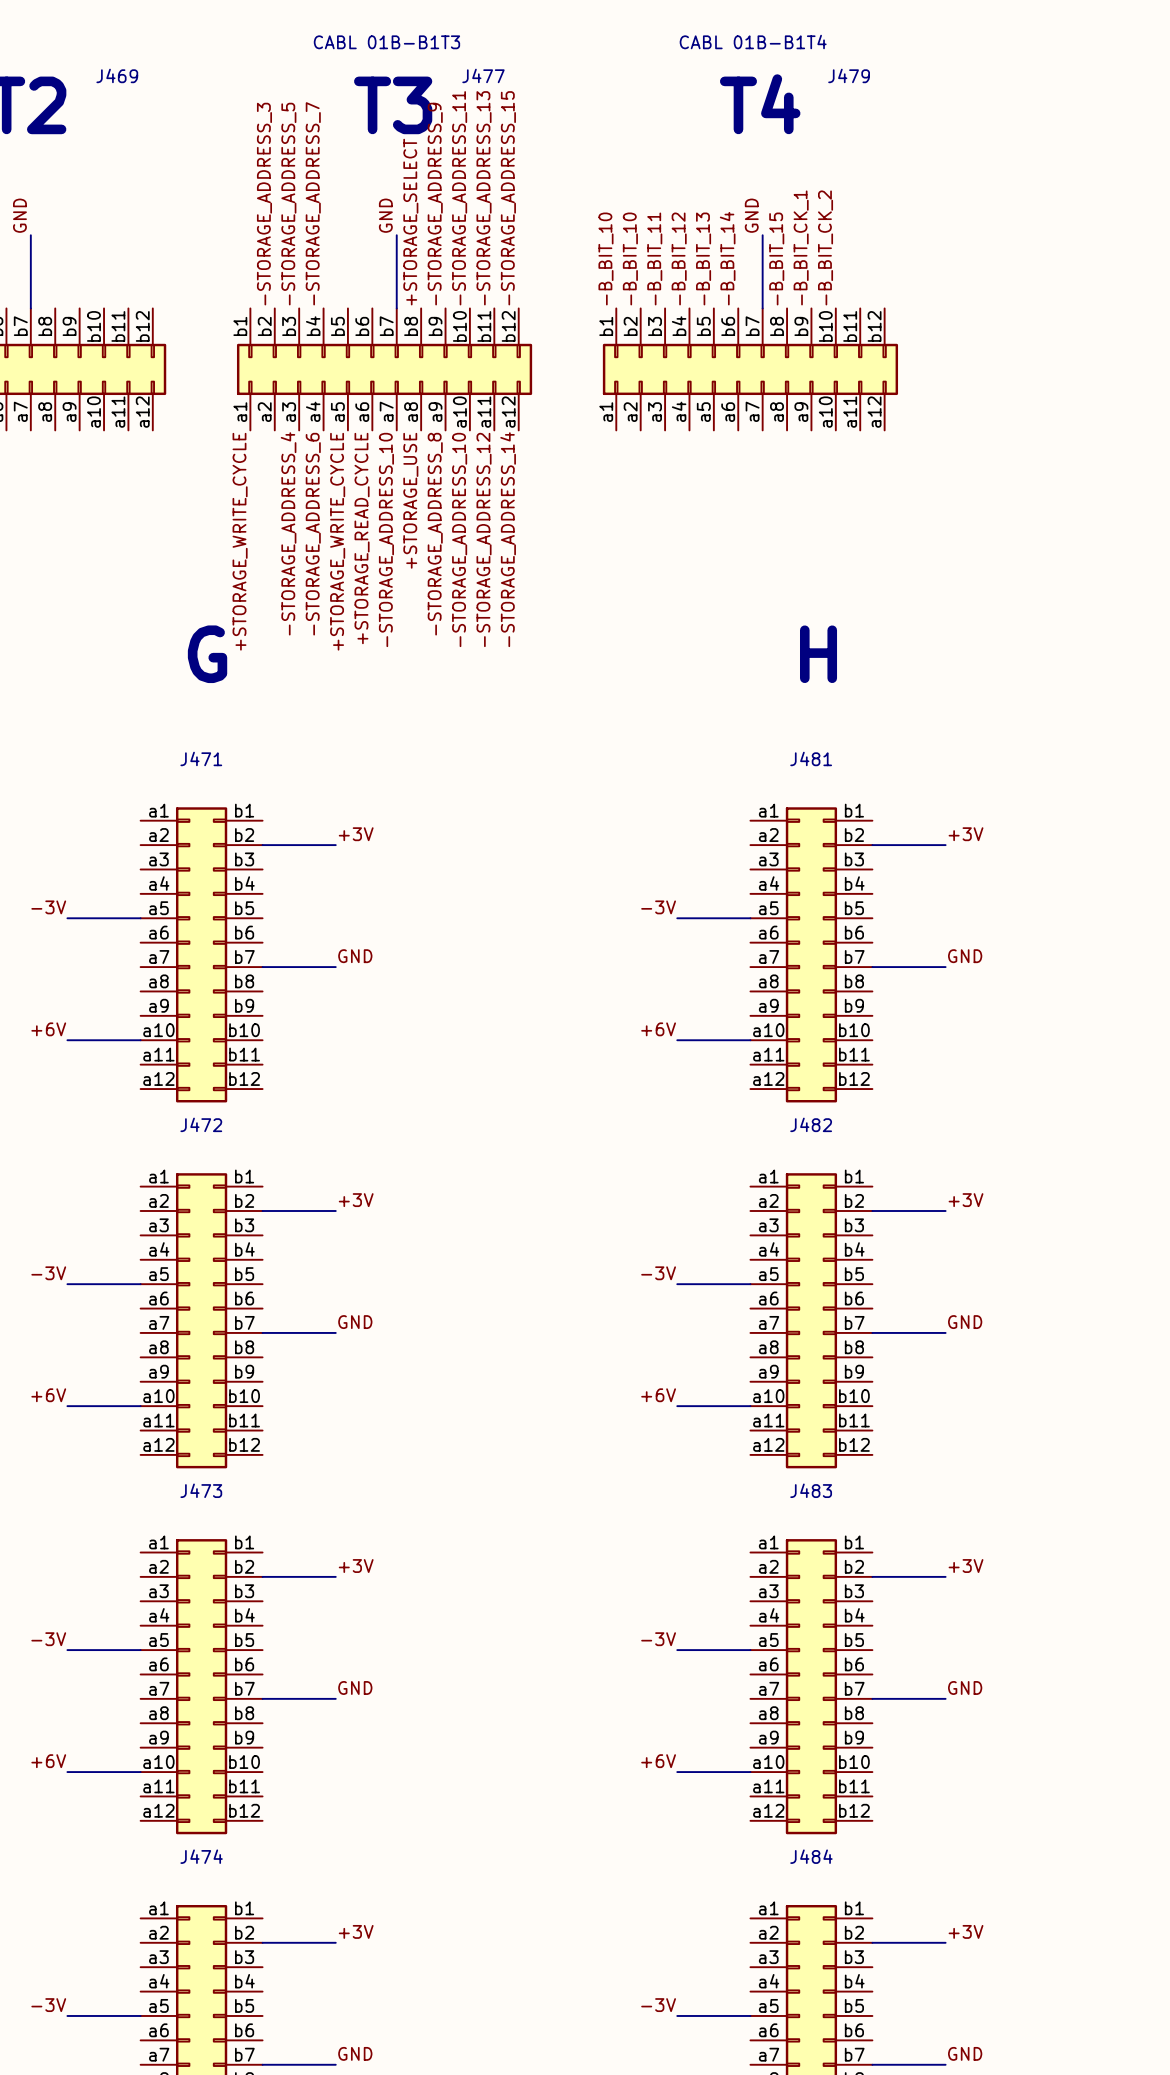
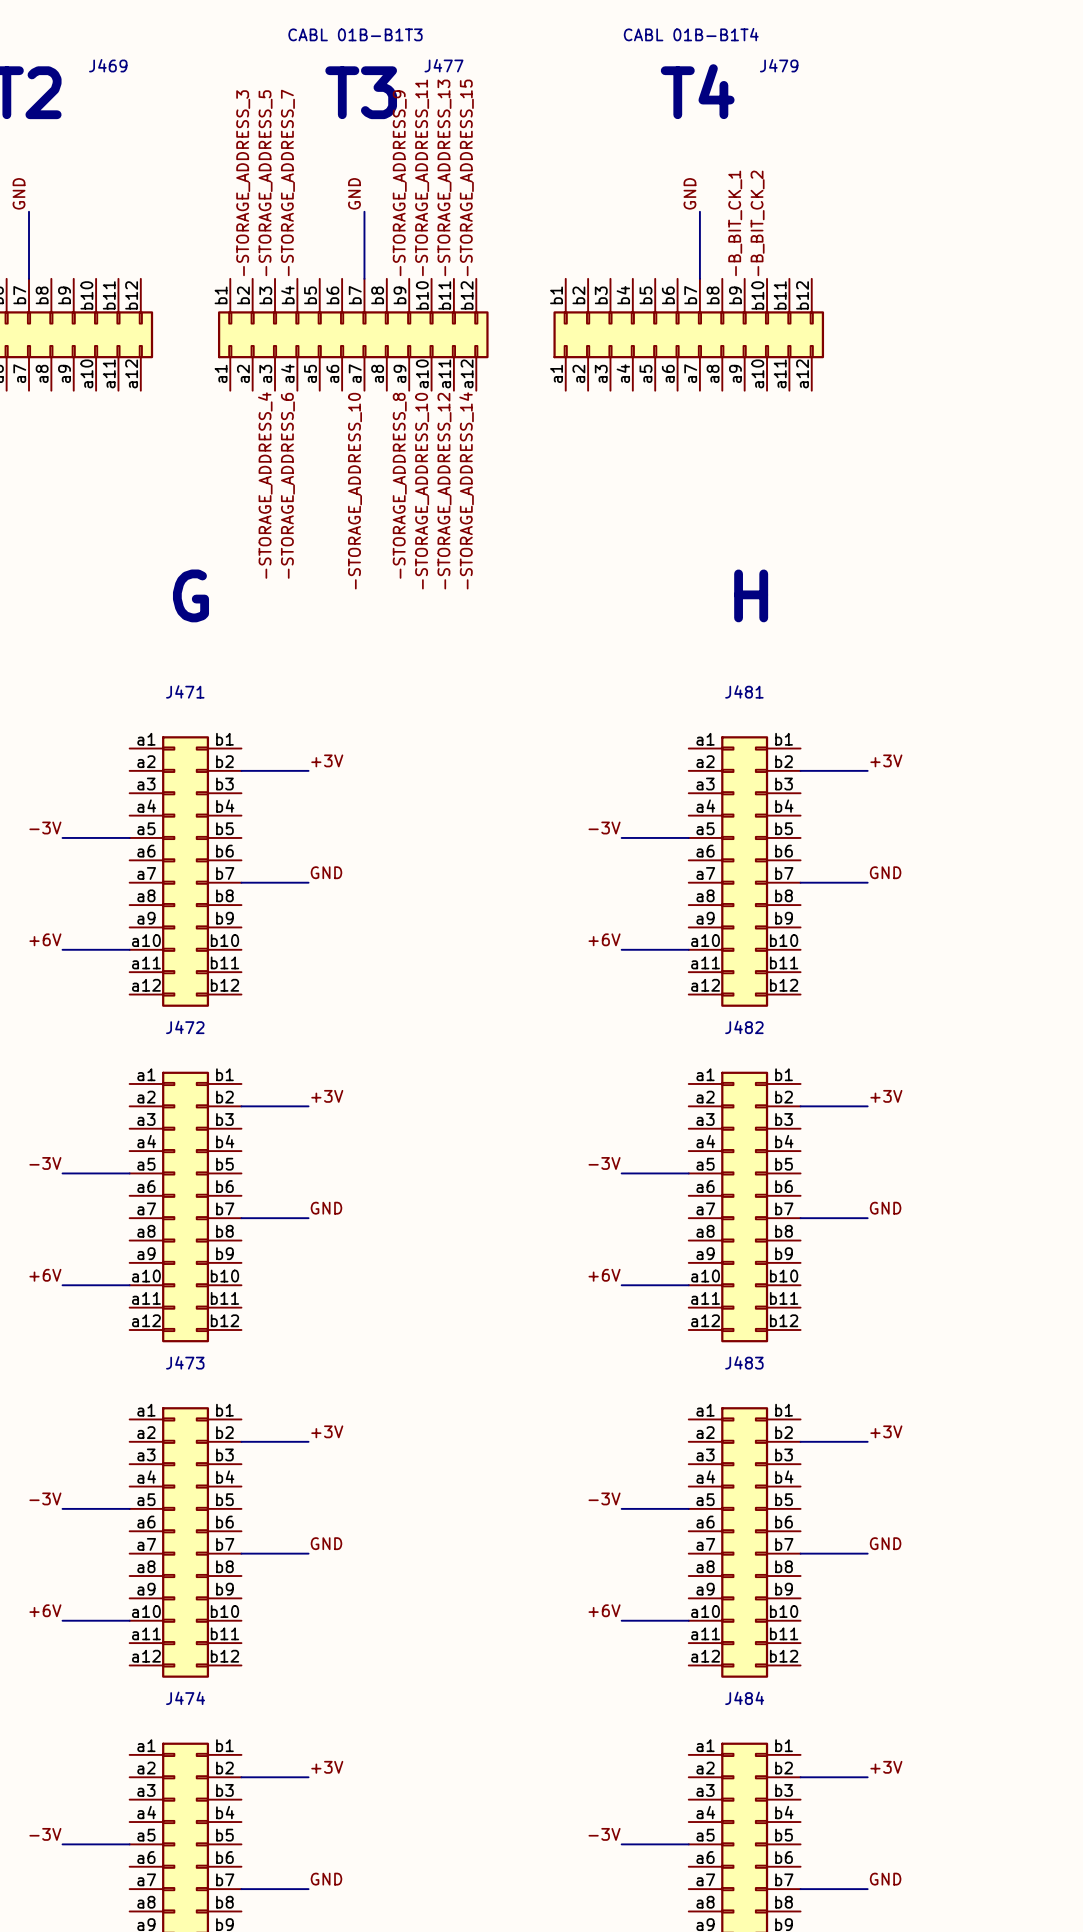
label: +STORAGE_SELECT (410, 222) -> none
label: -B_BIT_10 (605, 258) -> none
label: -B_BIT_10 (630, 258) -> none
label: -B_BIT_11 (654, 258) -> none
label: -B_BIT_12 (679, 258) -> none
label: -B_BIT_13 (703, 258) -> none
label: -B_BIT_14 (727, 258) -> none
label: -B_BIT_15 (776, 258) -> none
label: +STORAGE_USE (410, 500) -> none
label: +STORAGE_READ_CYCLE (362, 538) -> none
label: +STORAGE_WRITE_CYCLE (240, 541) -> none
label: +STORAGE_WRITE_CYCLE (337, 541) -> none

